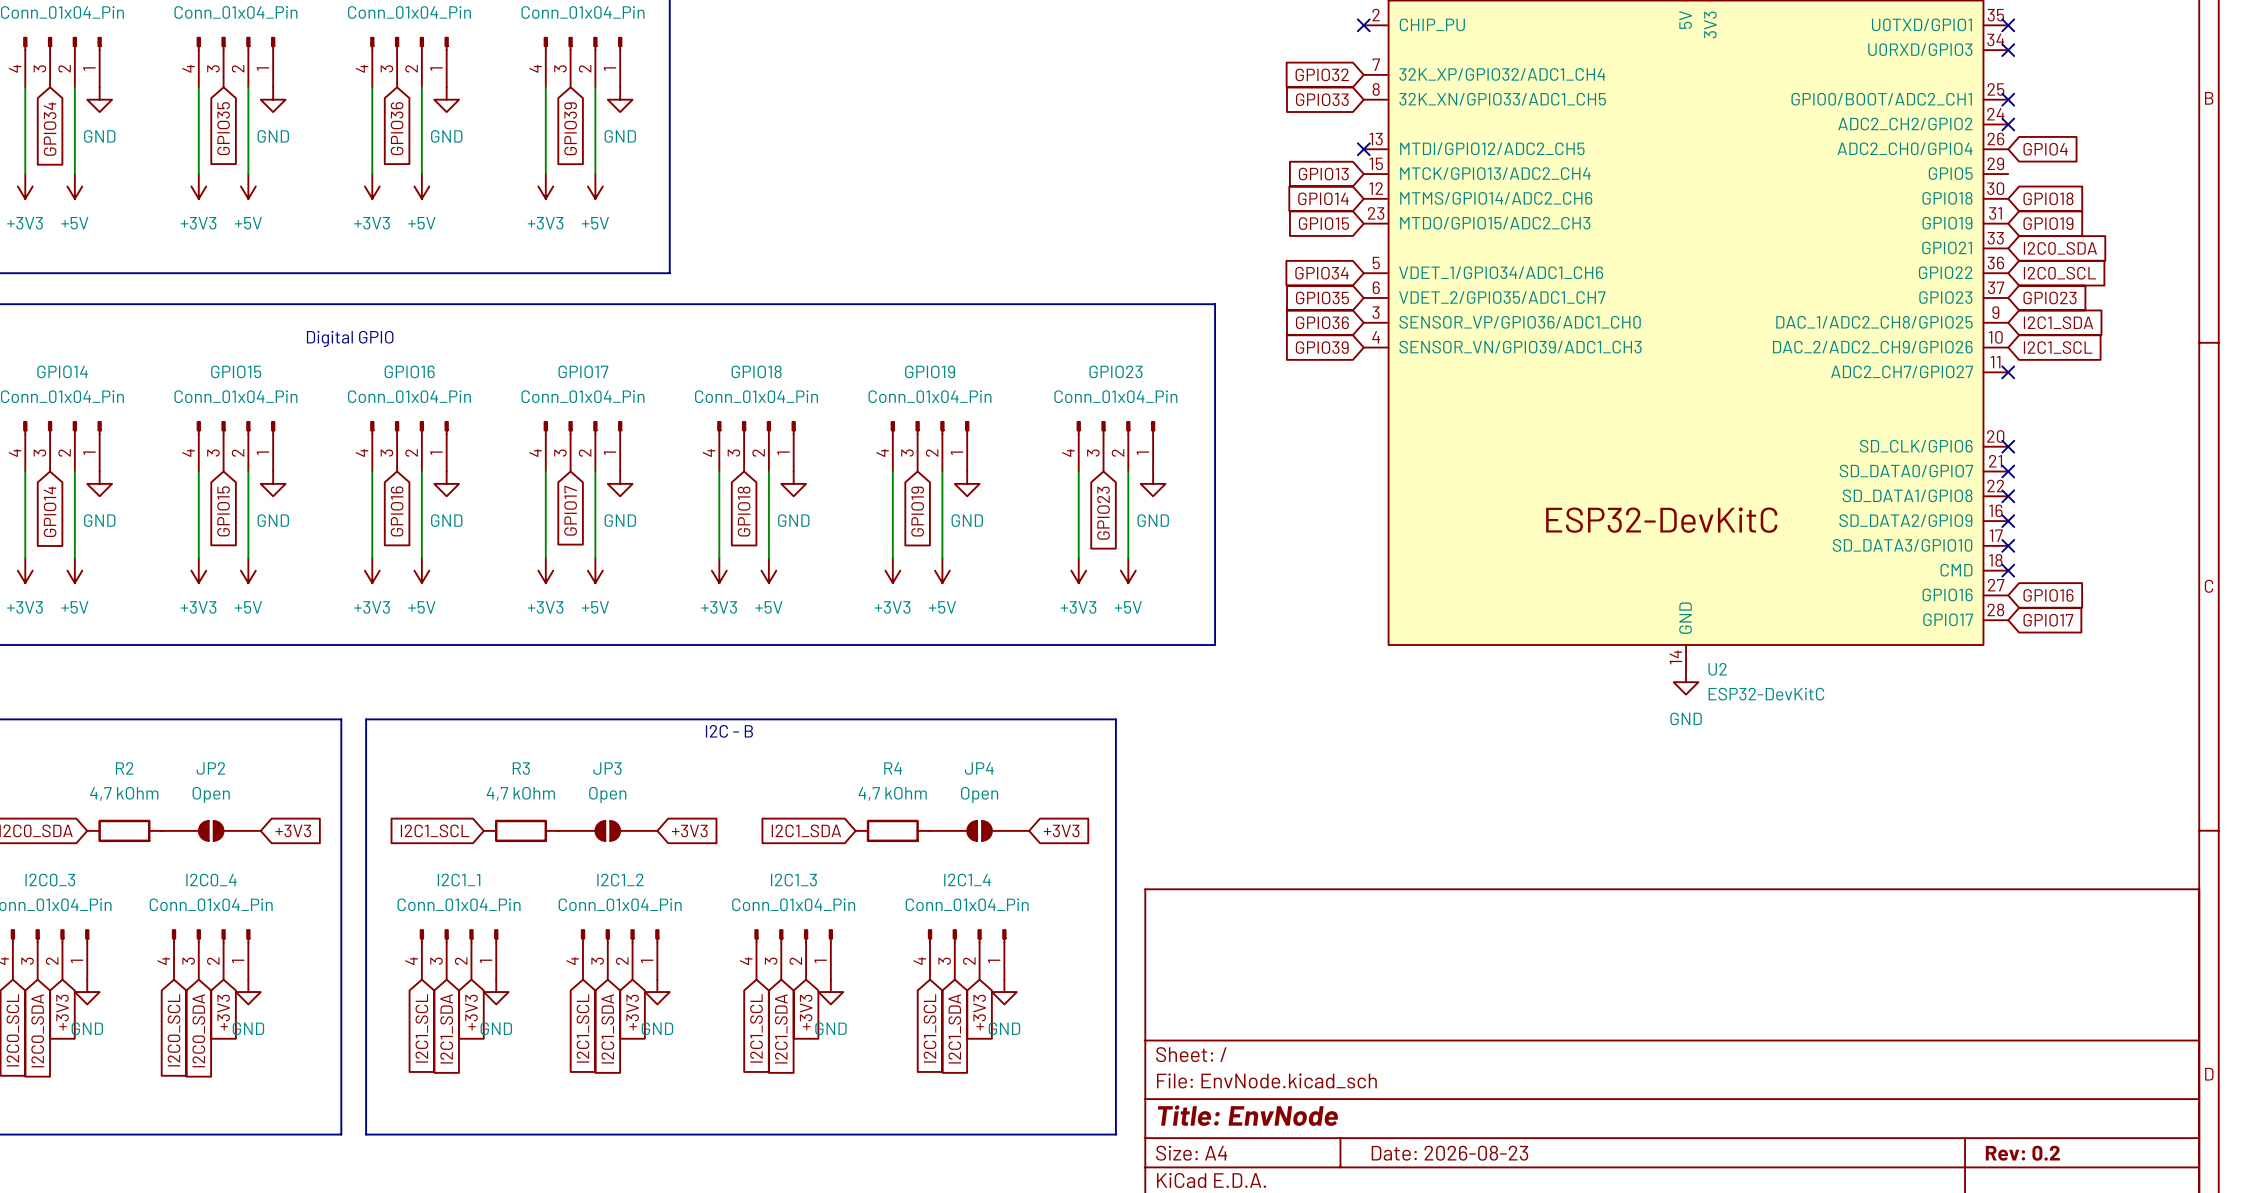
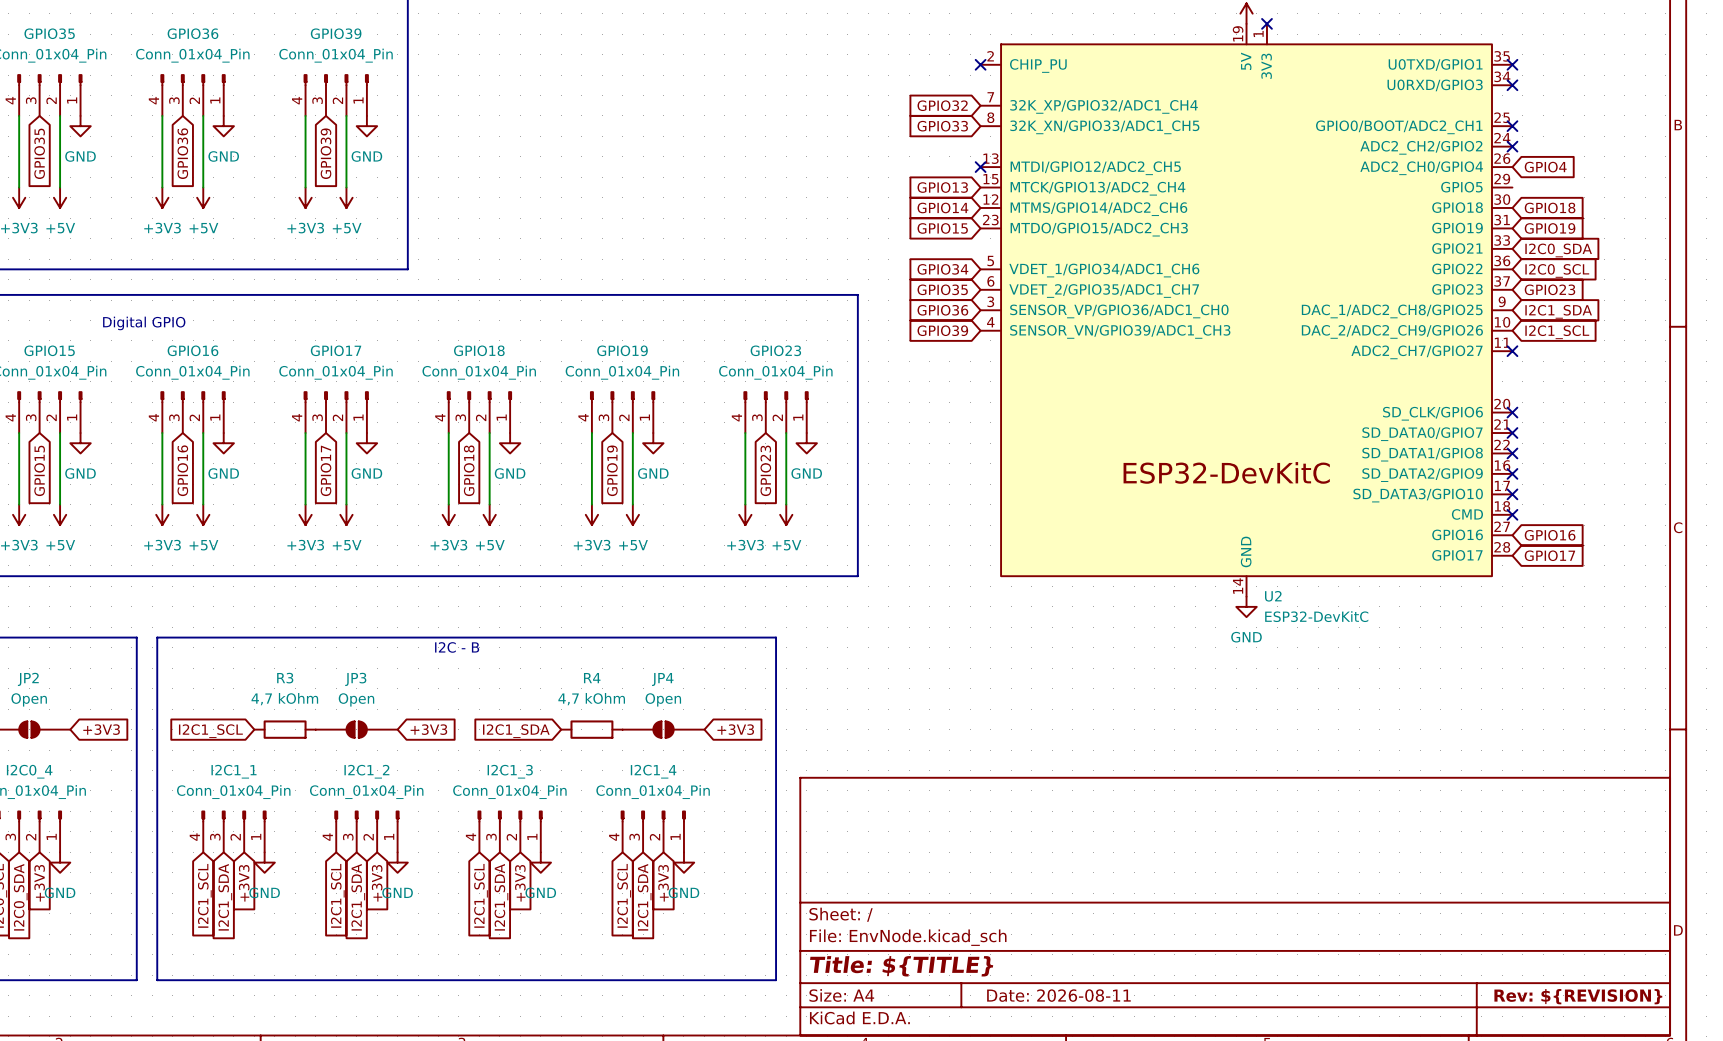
title block: Title: EnvNode (1247, 1115) -> Title: ${TITLE} (901, 966)
title block: Date: 2026-08-23 (1449, 1153) -> Date: 2026-08-11 (1058, 995)
title block: Rev: 0.2 (2022, 1153) -> Rev: ${REVISION} (1578, 996)

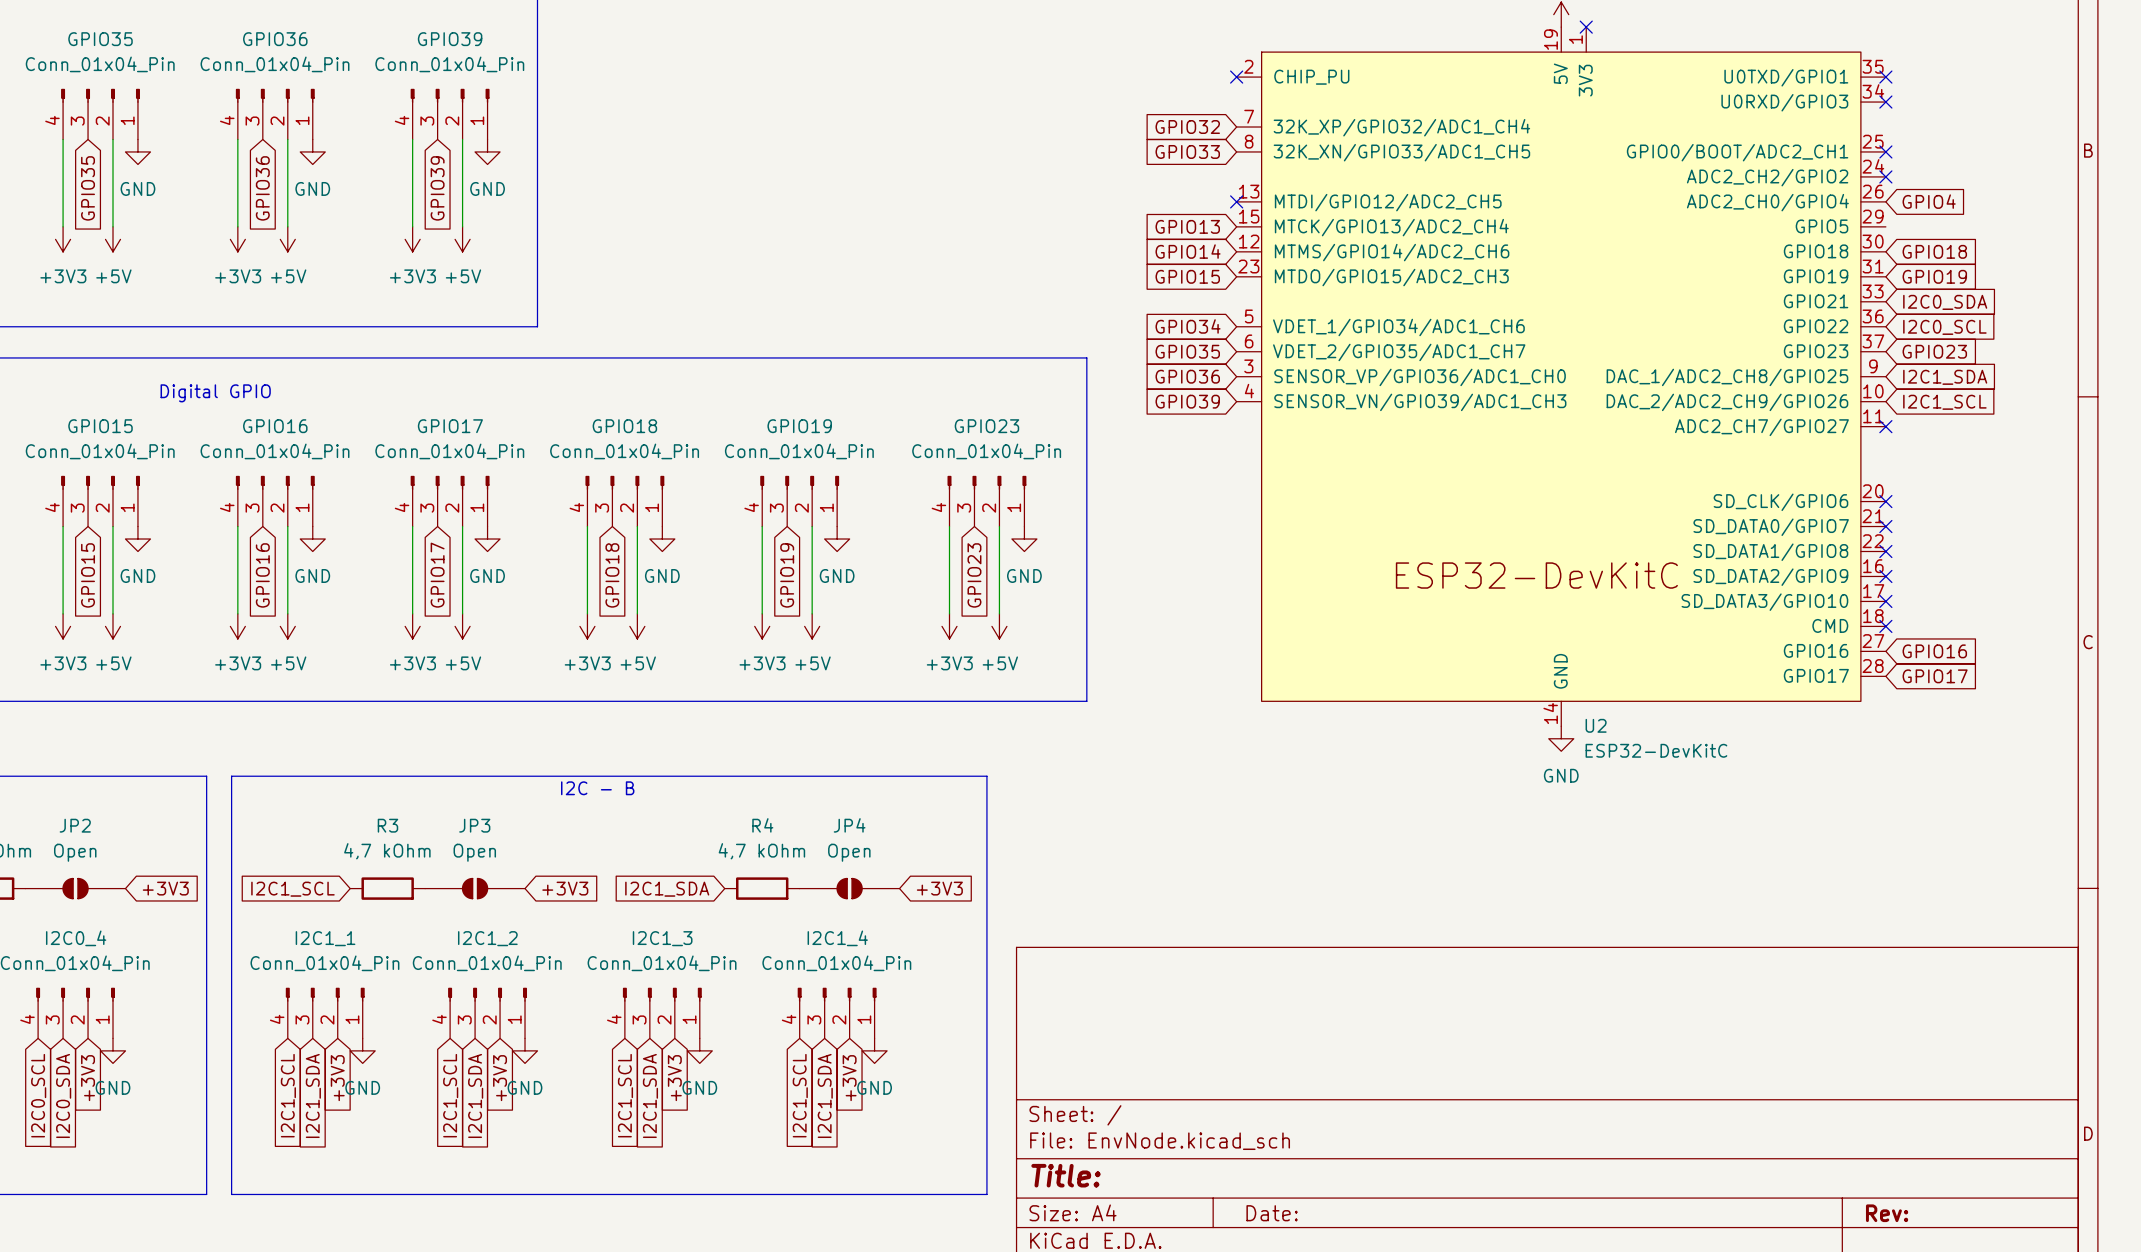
title block: Title: ${TITLE} (901, 966) -> Title: (1066, 1175)
title block: Date: 2026-08-11 (1058, 995) -> Date: (1272, 1213)
title block: Rev: ${REVISION} (1578, 996) -> Rev: (1887, 1213)

